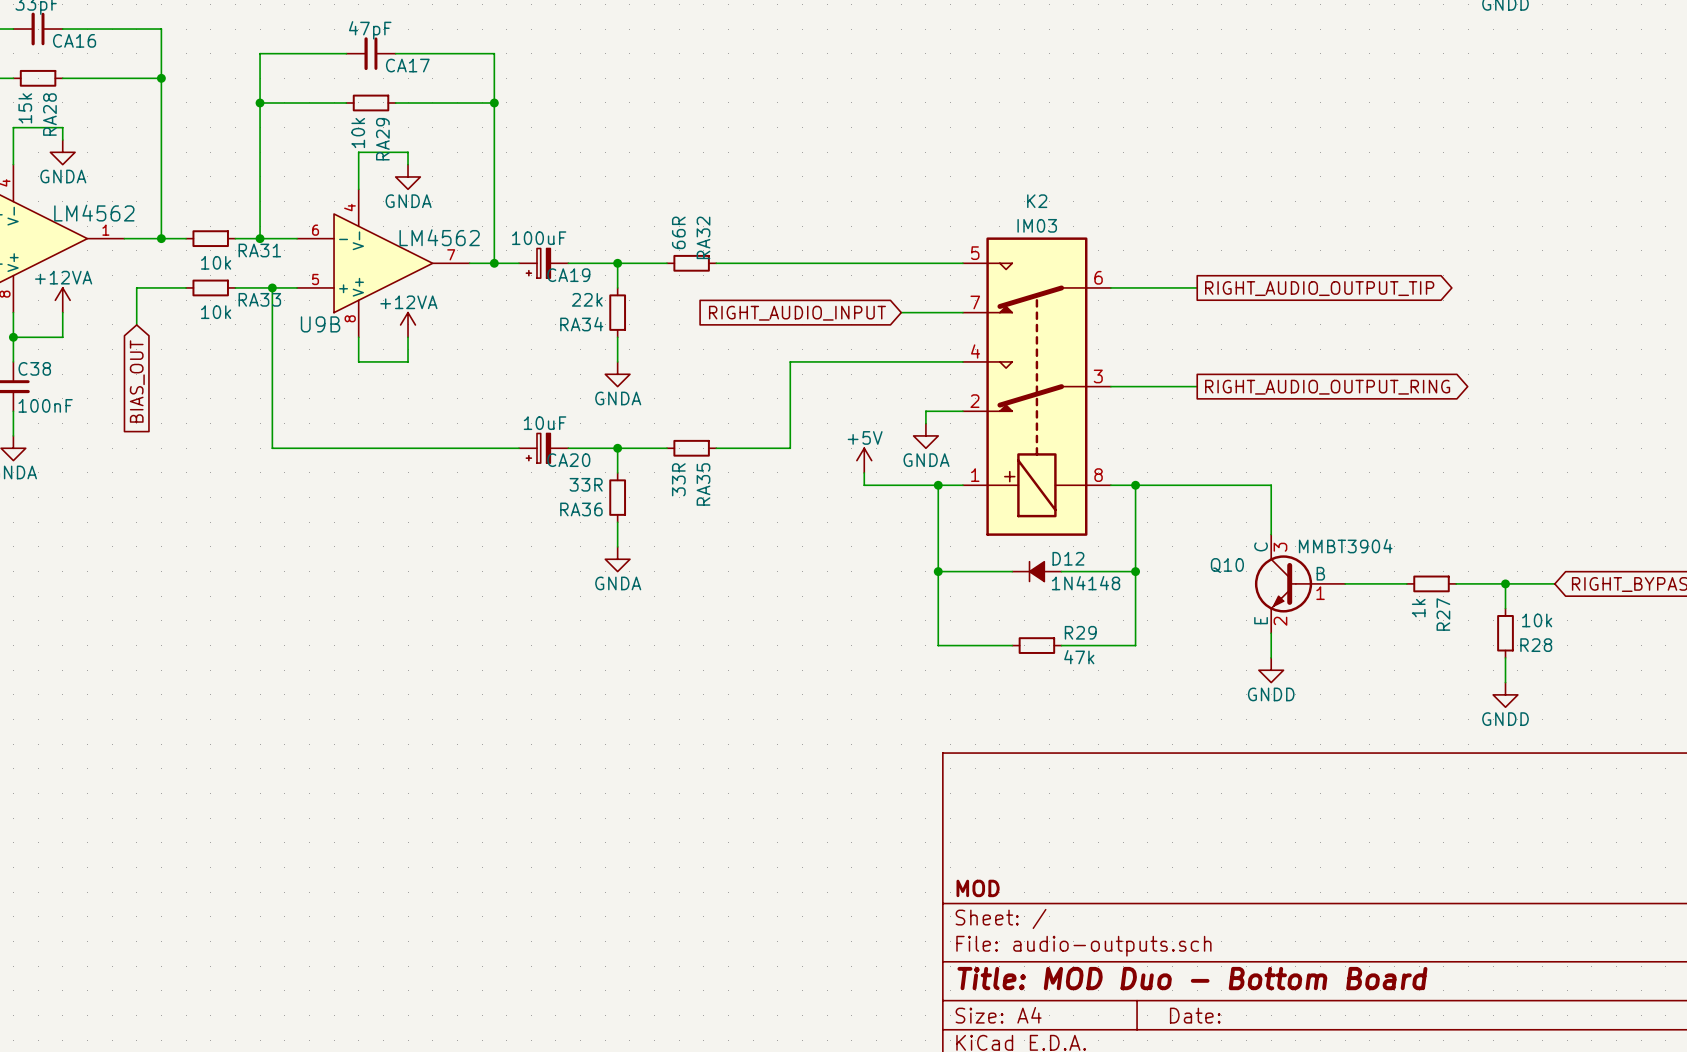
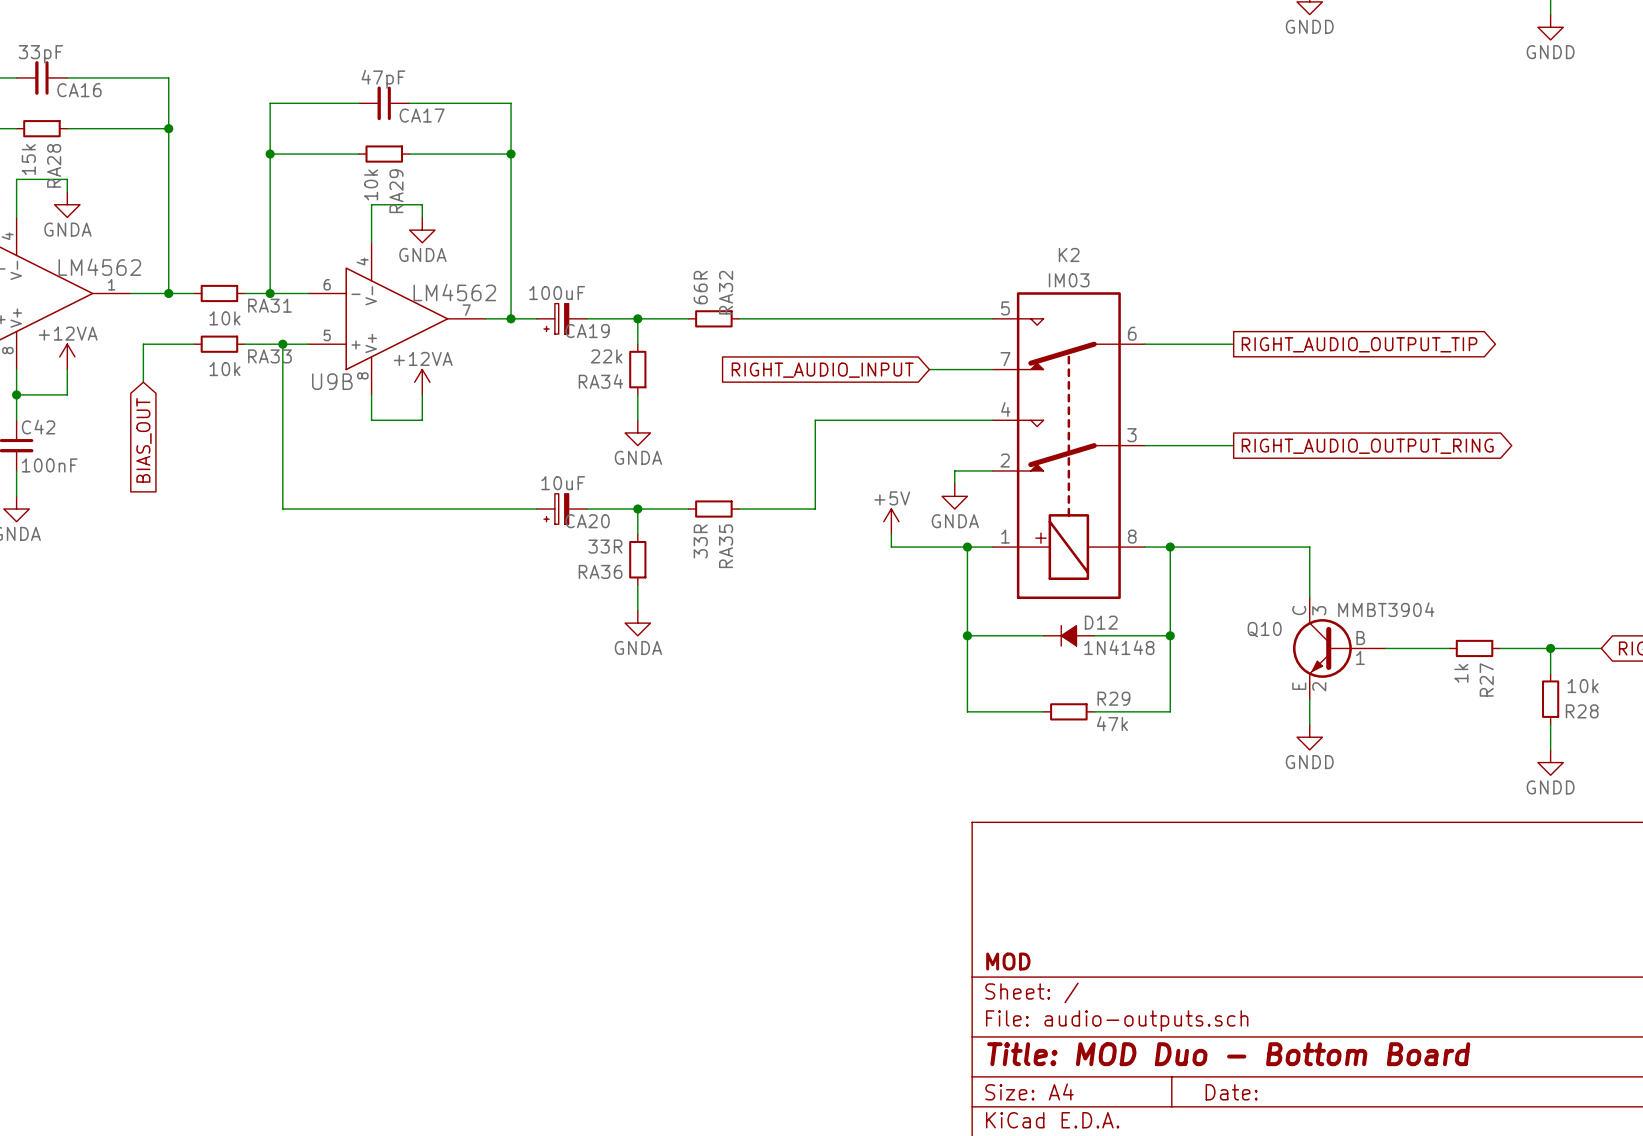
C38 name: C38 (34, 368) -> C42 (38, 427)

